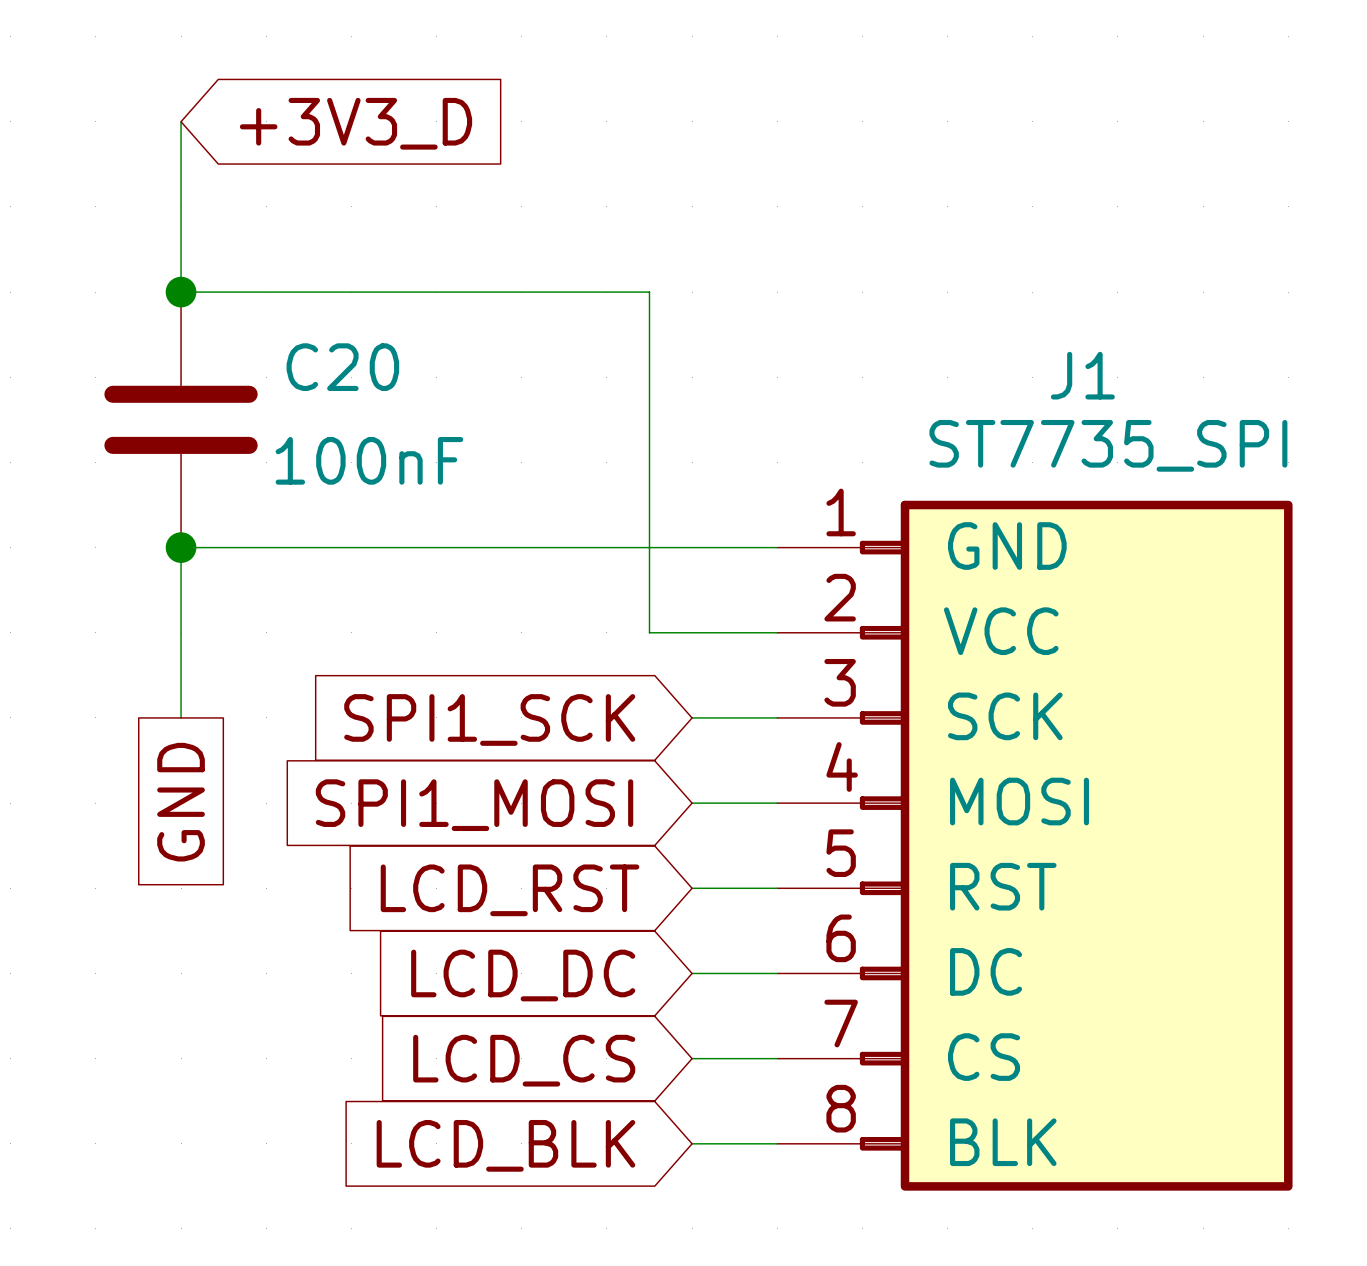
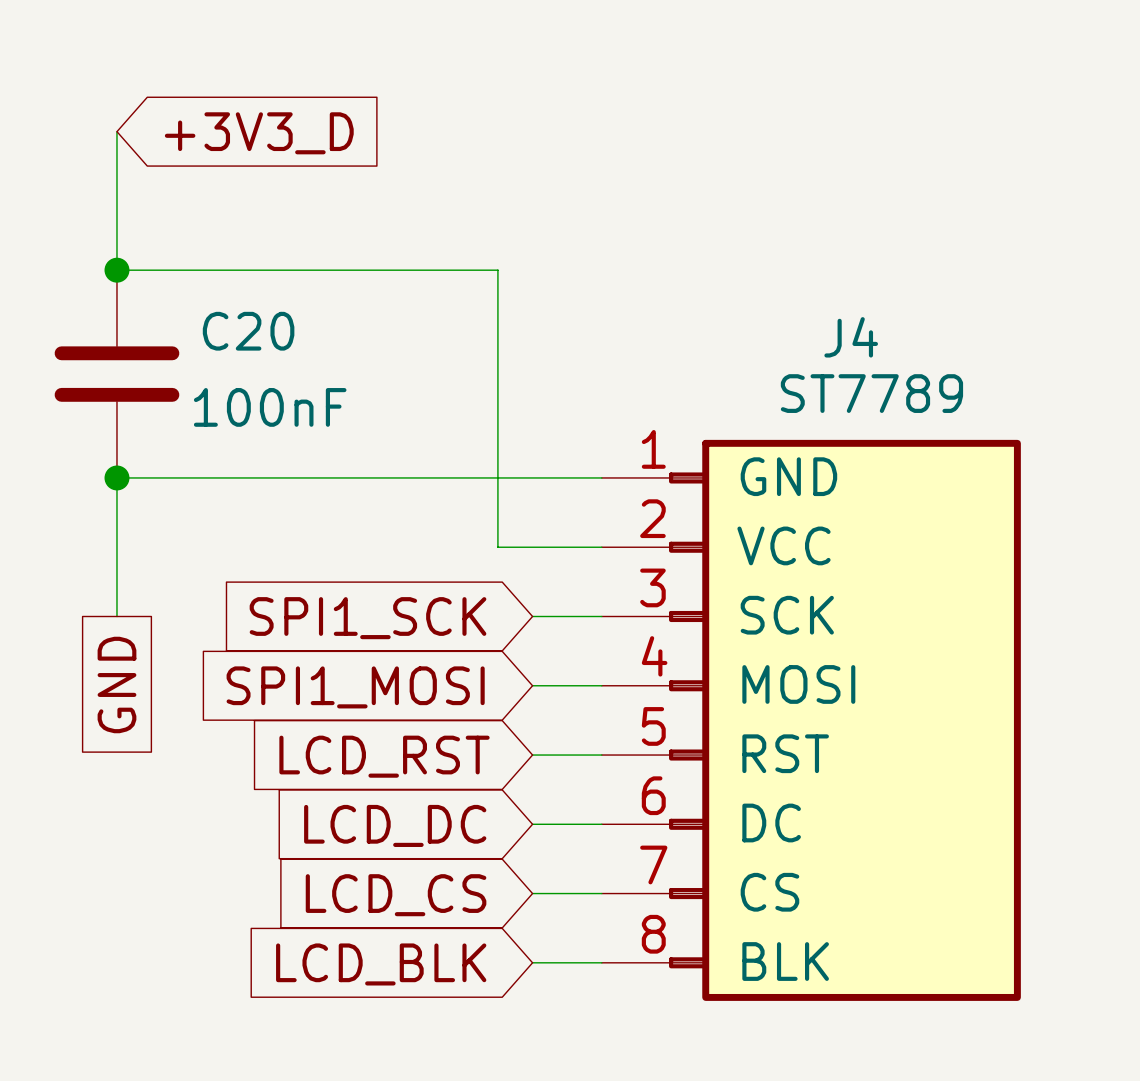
J1 name: J1 (1082, 375) -> J4 (851, 337)
J1 value: ST7735_SPI (1108, 445) -> ST7789 (871, 393)

